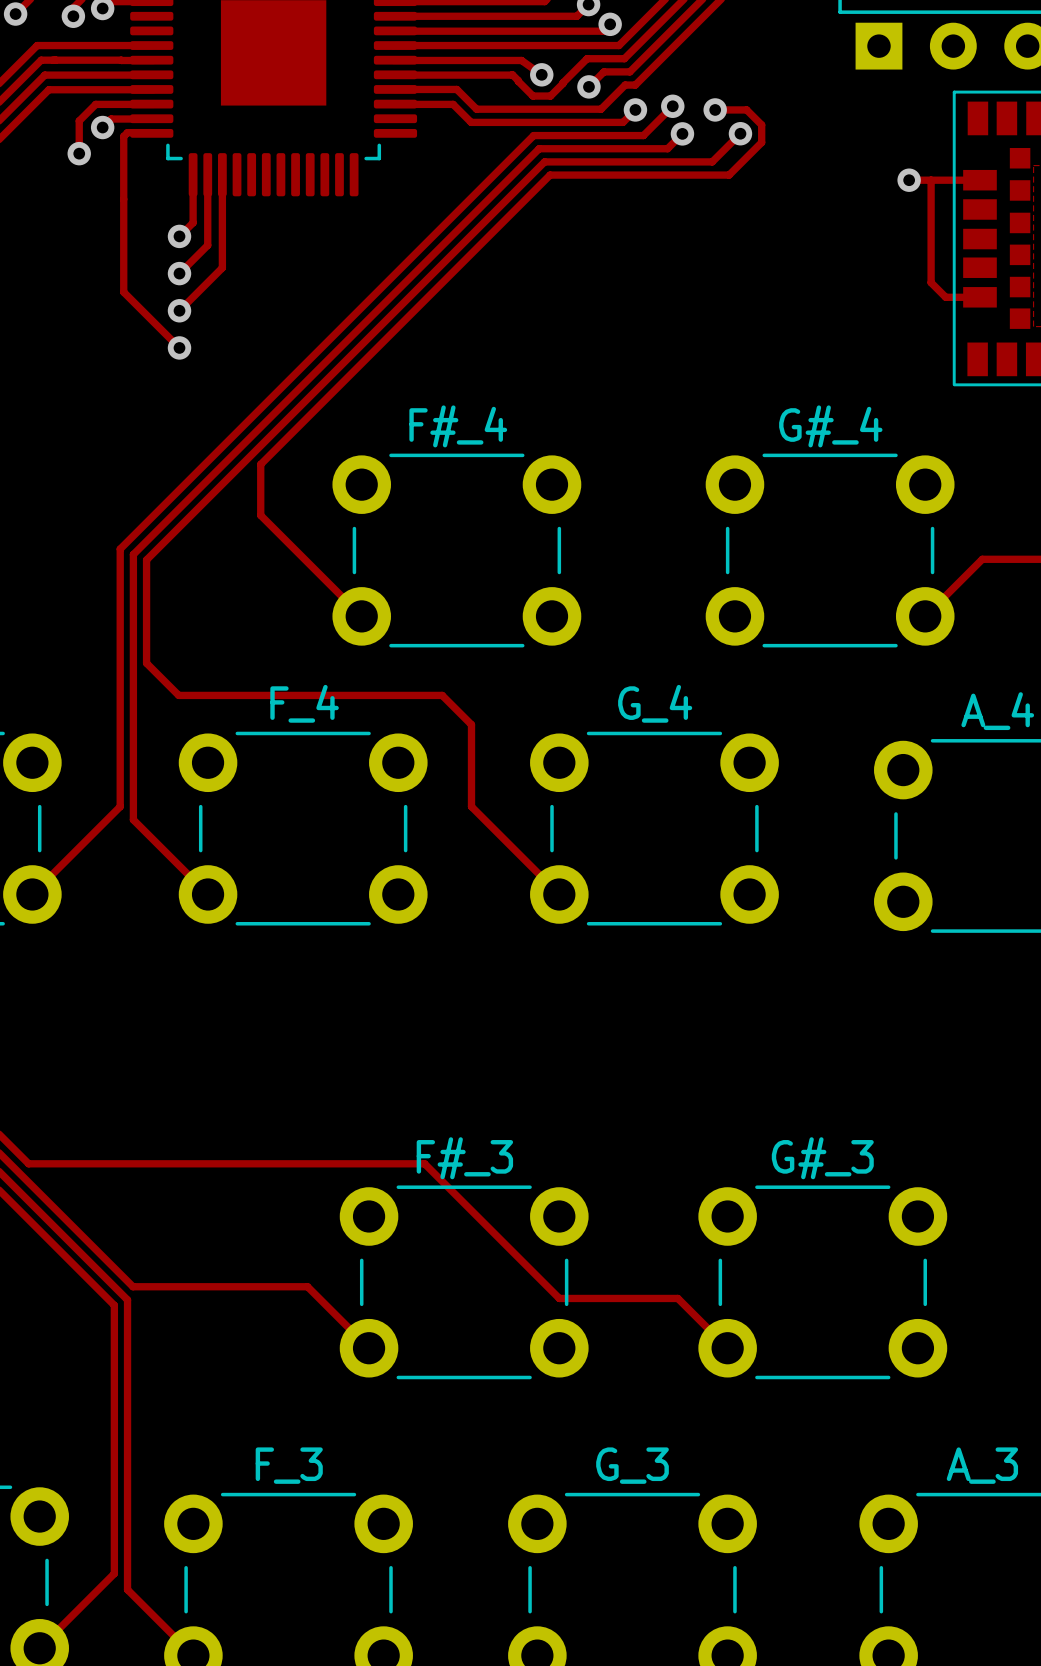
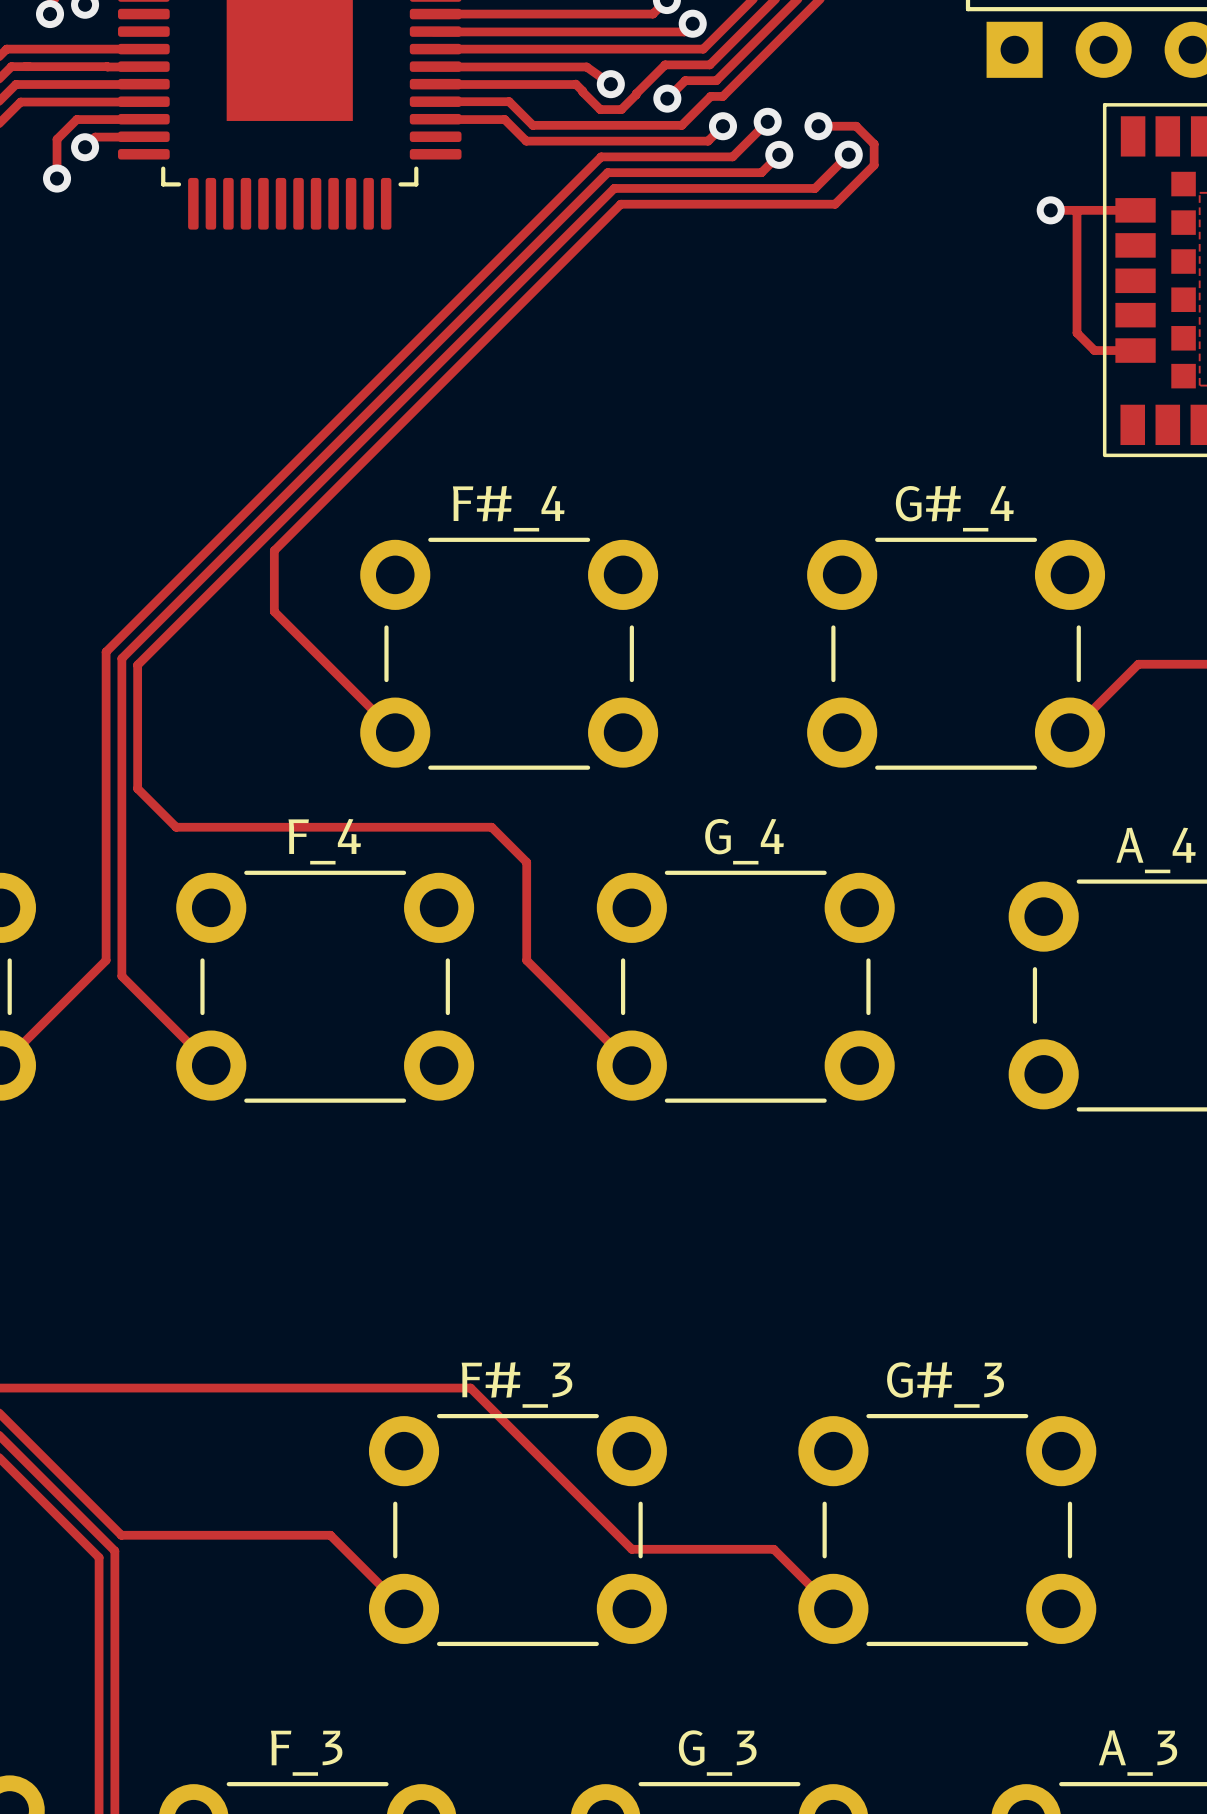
track: (151, 133) (127, 132) (123, 136) (123, 292) (179, 347) -> none
track: (193, 174) (193, 222) (179, 236) -> none
track: (207, 174) (207, 245) (179, 273) -> none
track: (222, 174) (222, 267) (179, 310) -> none
via: (179, 236) -> none
via: (179, 273) -> none
via: (179, 310) -> none
via: (179, 347) -> none

